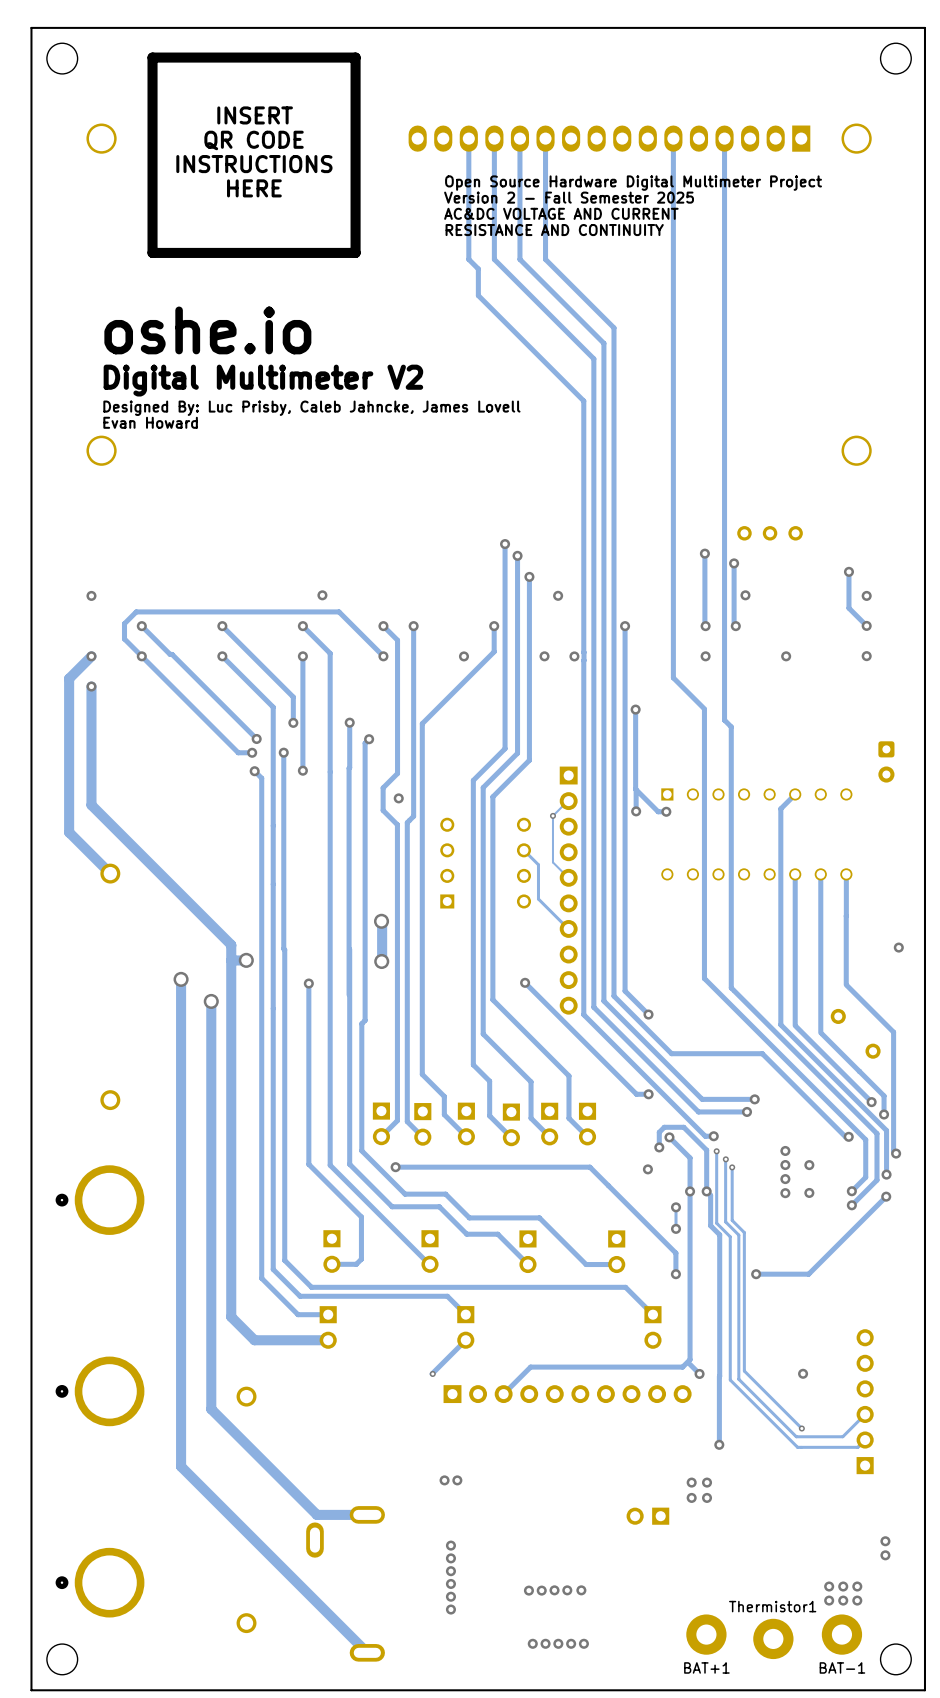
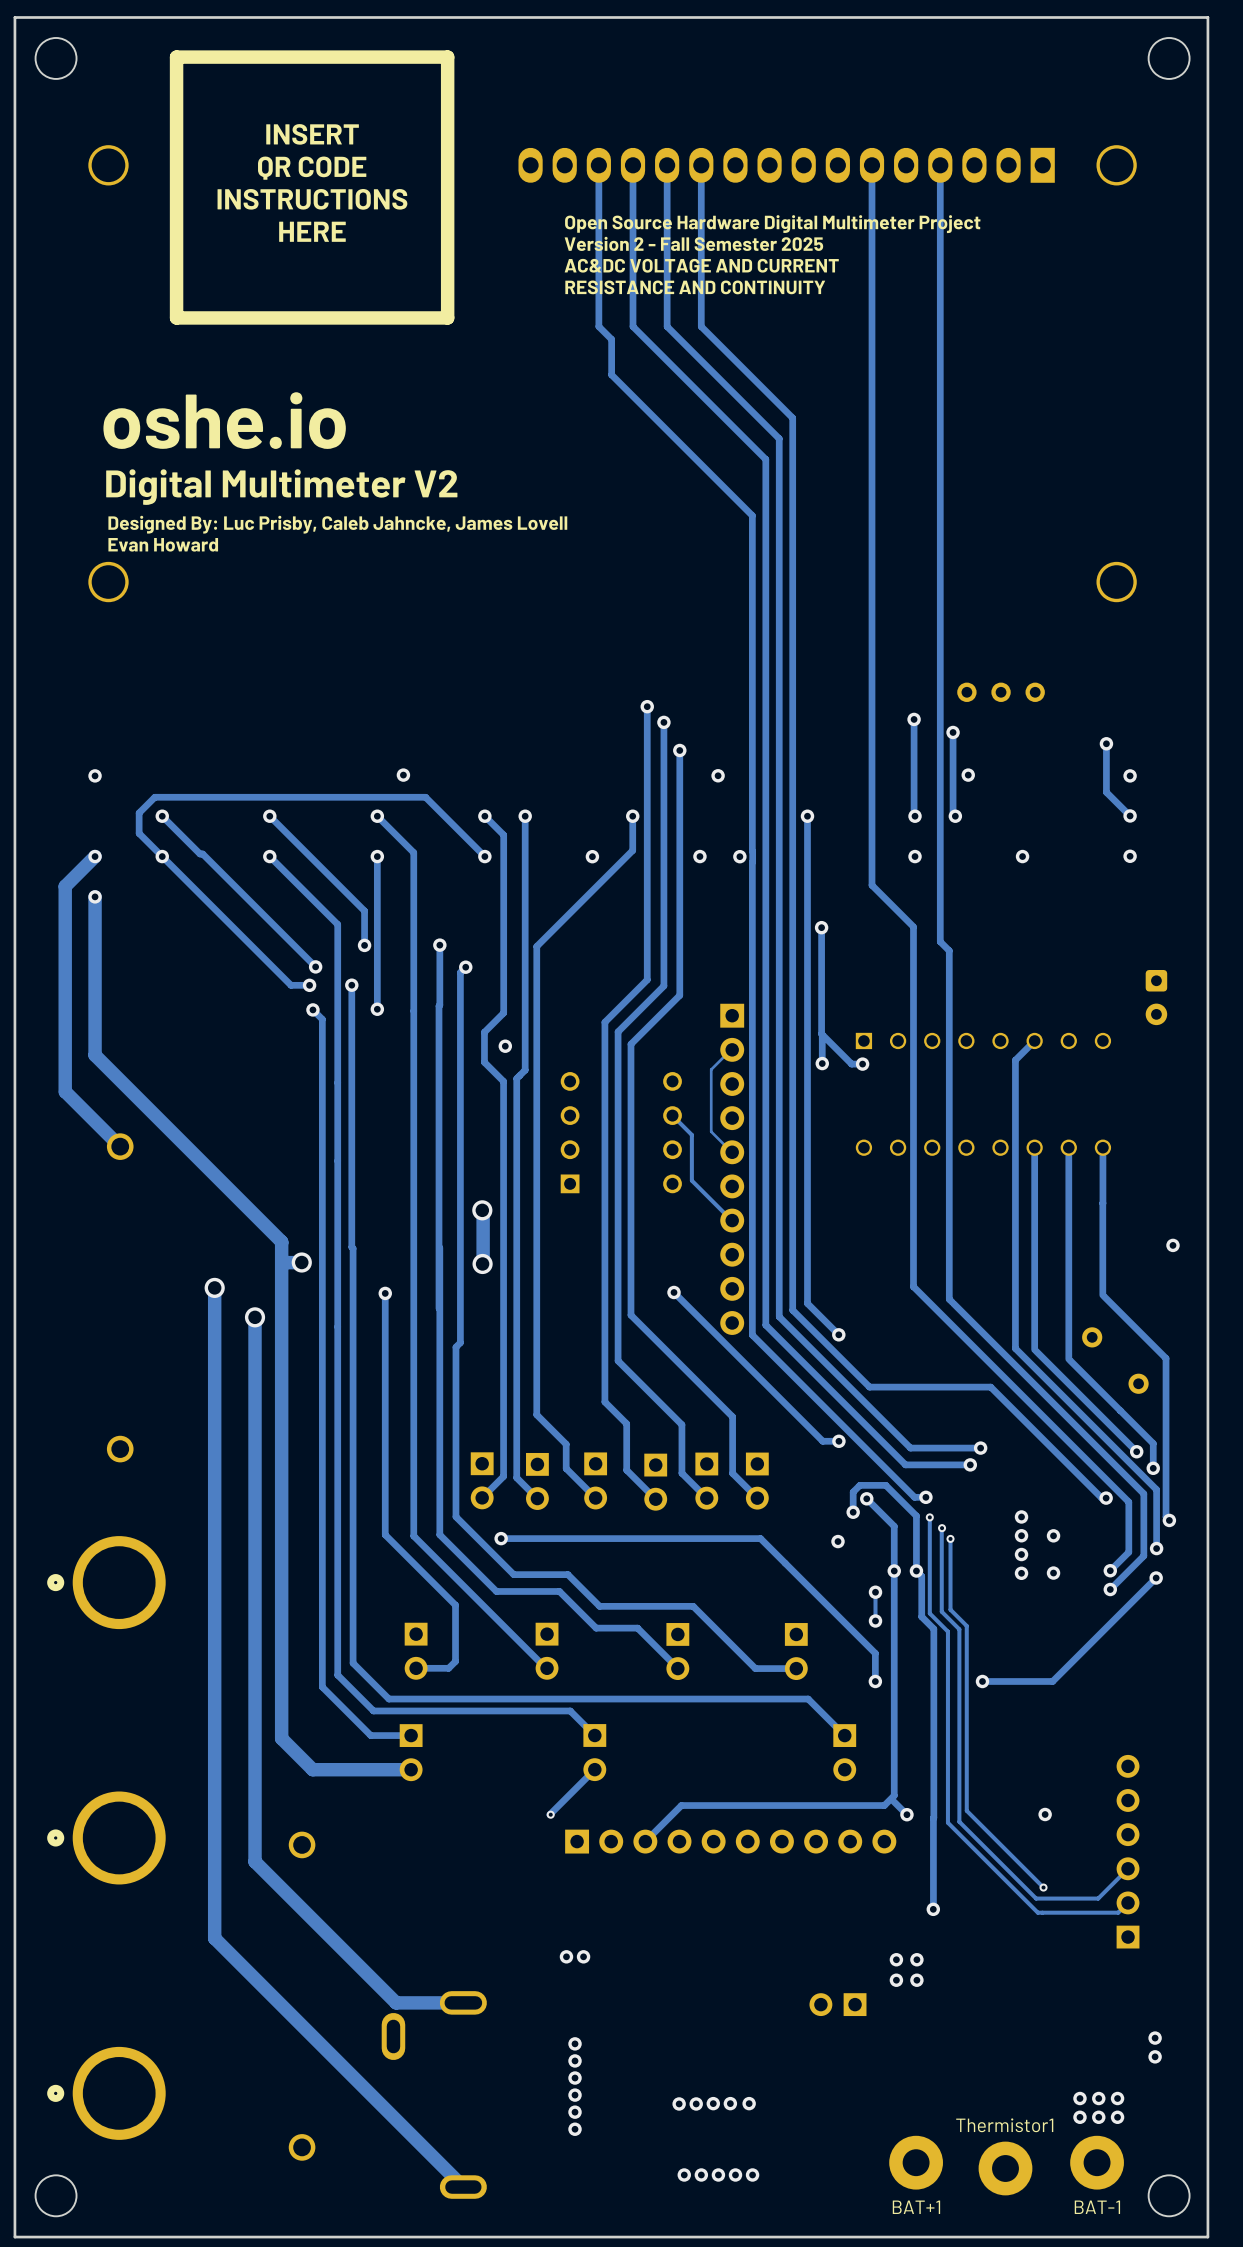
via: (552, 815) -> none

